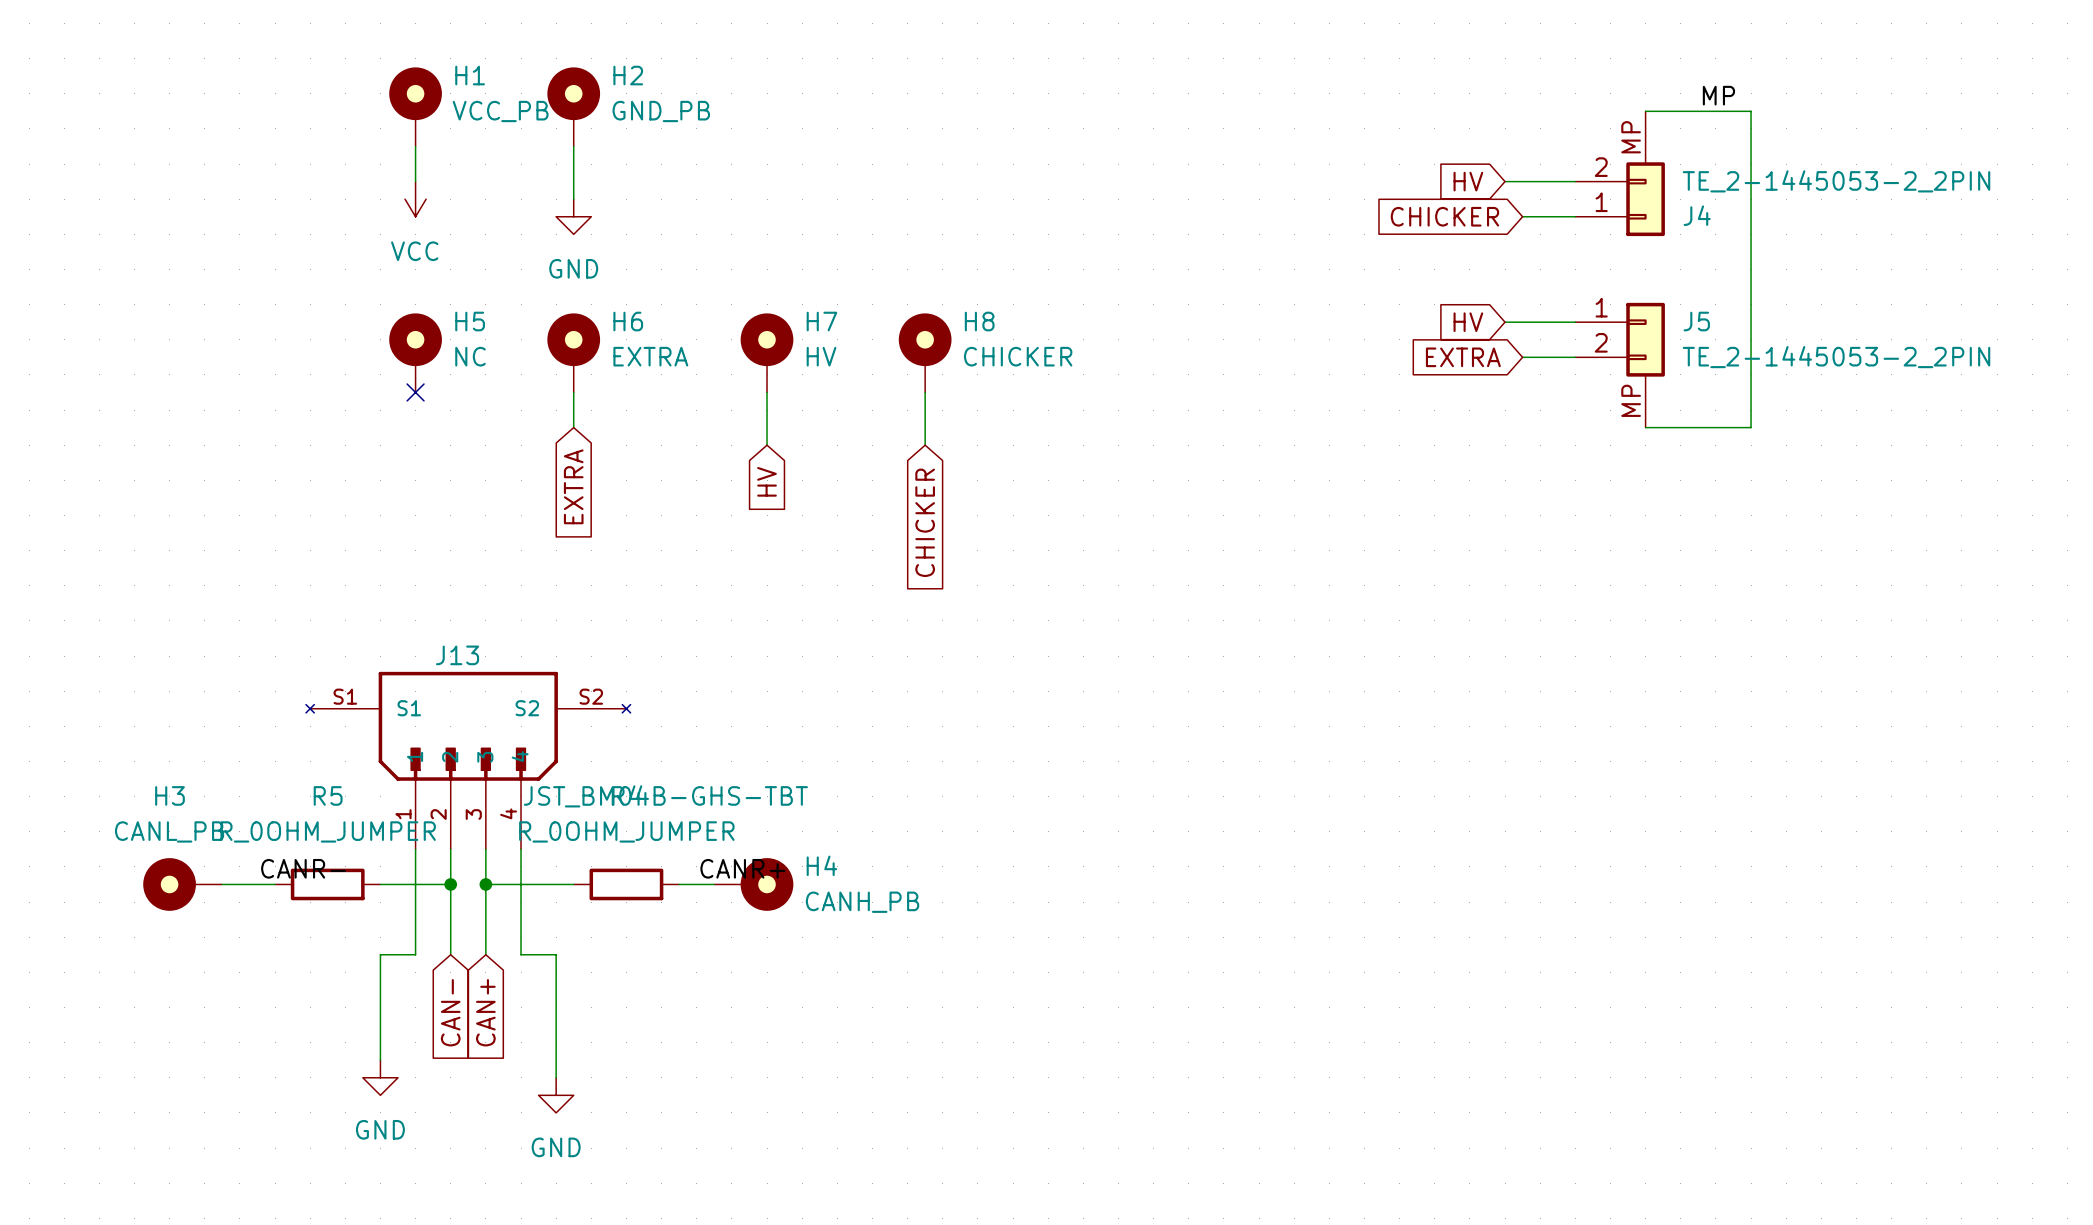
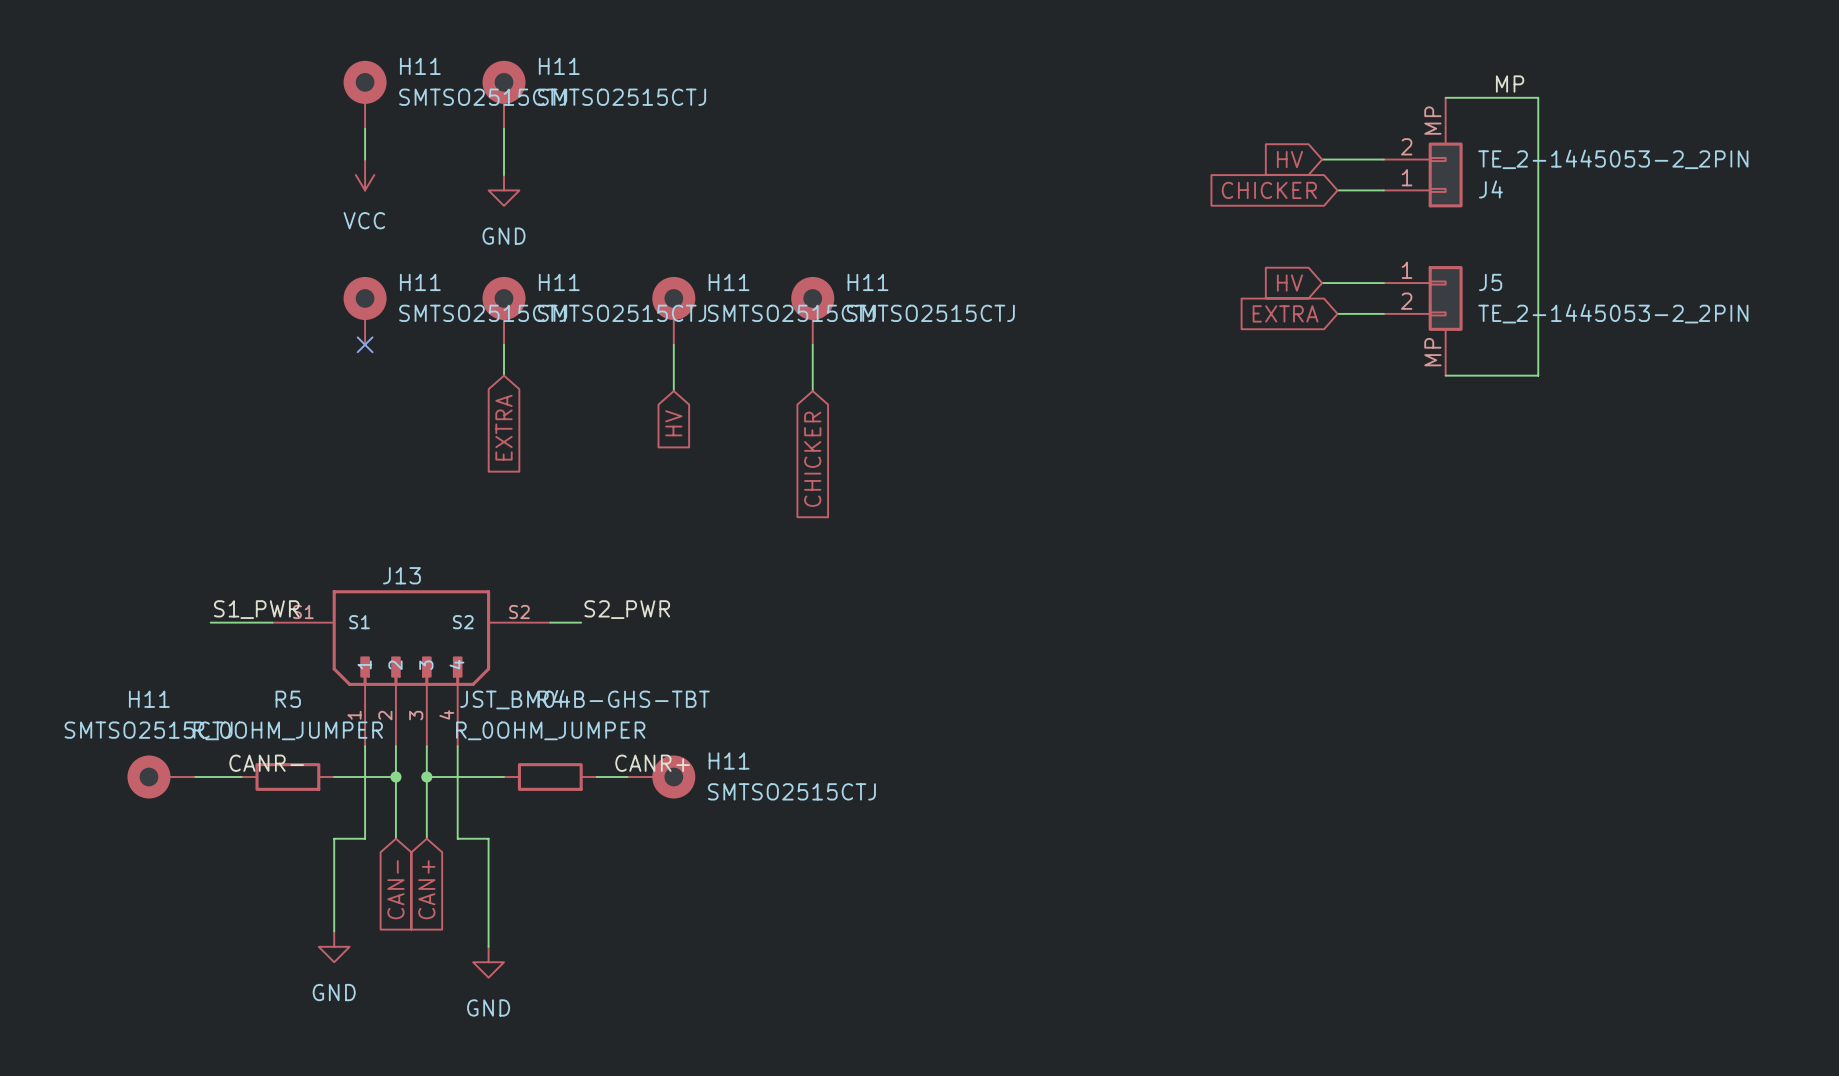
H1: VCC_PB (415, 106) -> none
H2: GND_PB (573, 106) -> none
H11: none -> SMTSO2515CTJ (365, 94)
H11: none -> SMTSO2515CTJ (504, 94)
H5: NC (415, 352) -> none
H6: EXTRA (573, 352) -> none
H7: HV (767, 352) -> none
H8: CHICKER (925, 352) -> none
H11: none -> SMTSO2515CTJ (365, 310)
H11: none -> SMTSO2515CTJ (504, 310)
H11: none -> SMTSO2515CTJ (673, 310)
H11: none -> SMTSO2515CTJ (812, 310)
J13 symbol: [305, 671, 631, 850] -> [272, 590, 551, 747]
label: none -> S1_PWR (256, 609)
label: none -> S2_PWR (627, 609)
wire: none -> (210, 622) (272, 622)
wire: none -> (550, 622) (581, 622)
H3: CANL_PB (182, 884) -> none
H11: none -> SMTSO2515CTJ (161, 777)
H11: none -> SMTSO2515CTJ (661, 777)
H4: CANH_PB (753, 884) -> none

